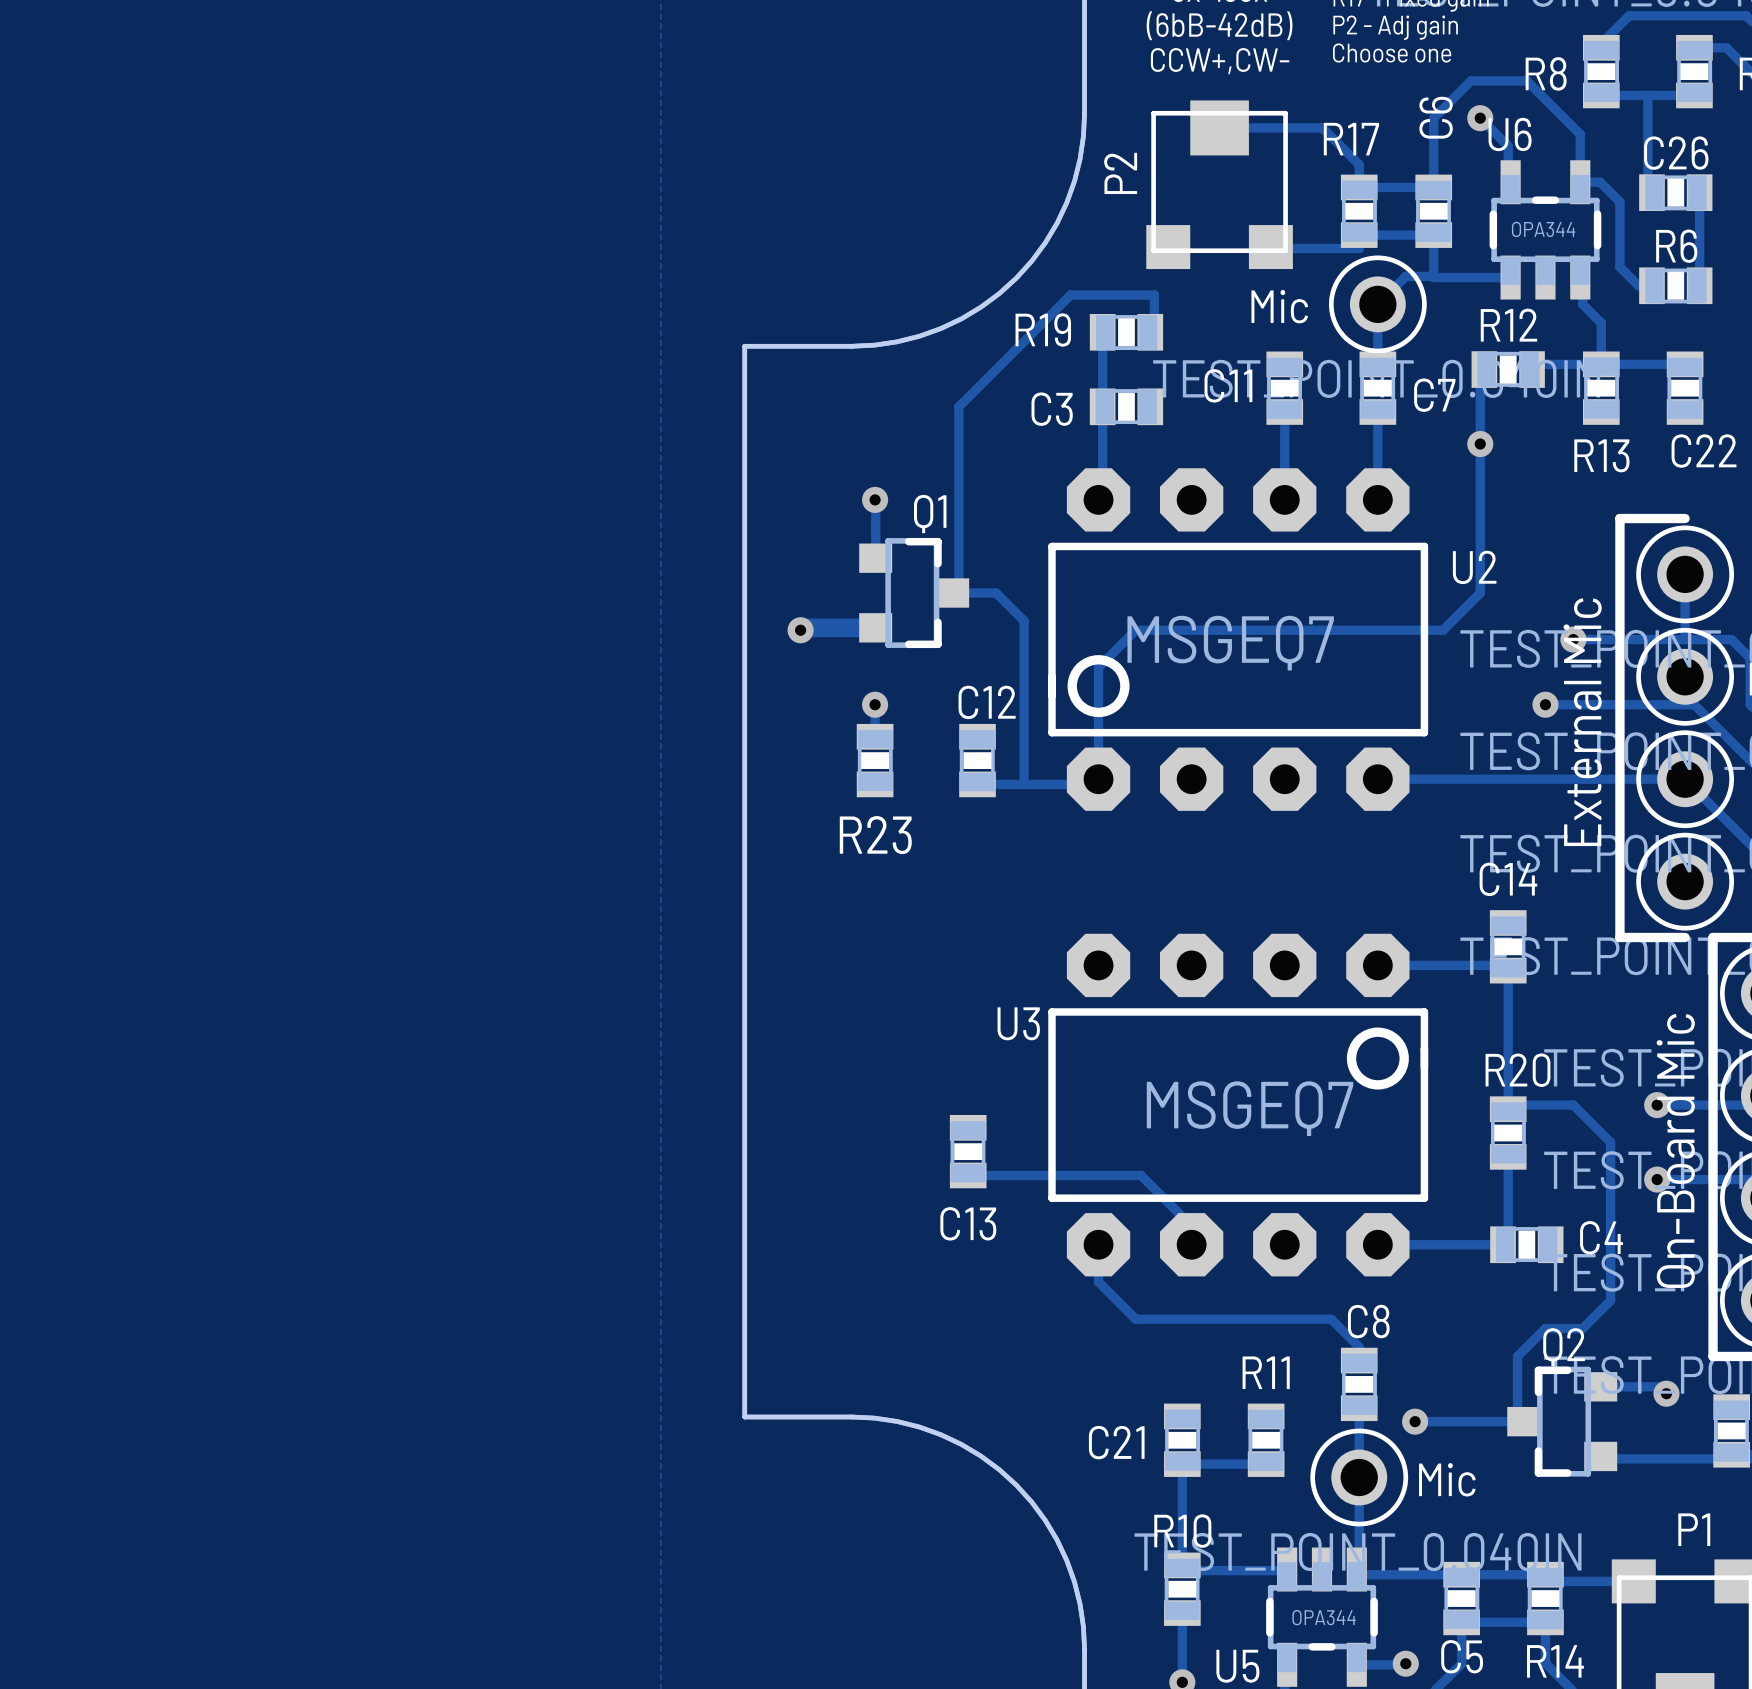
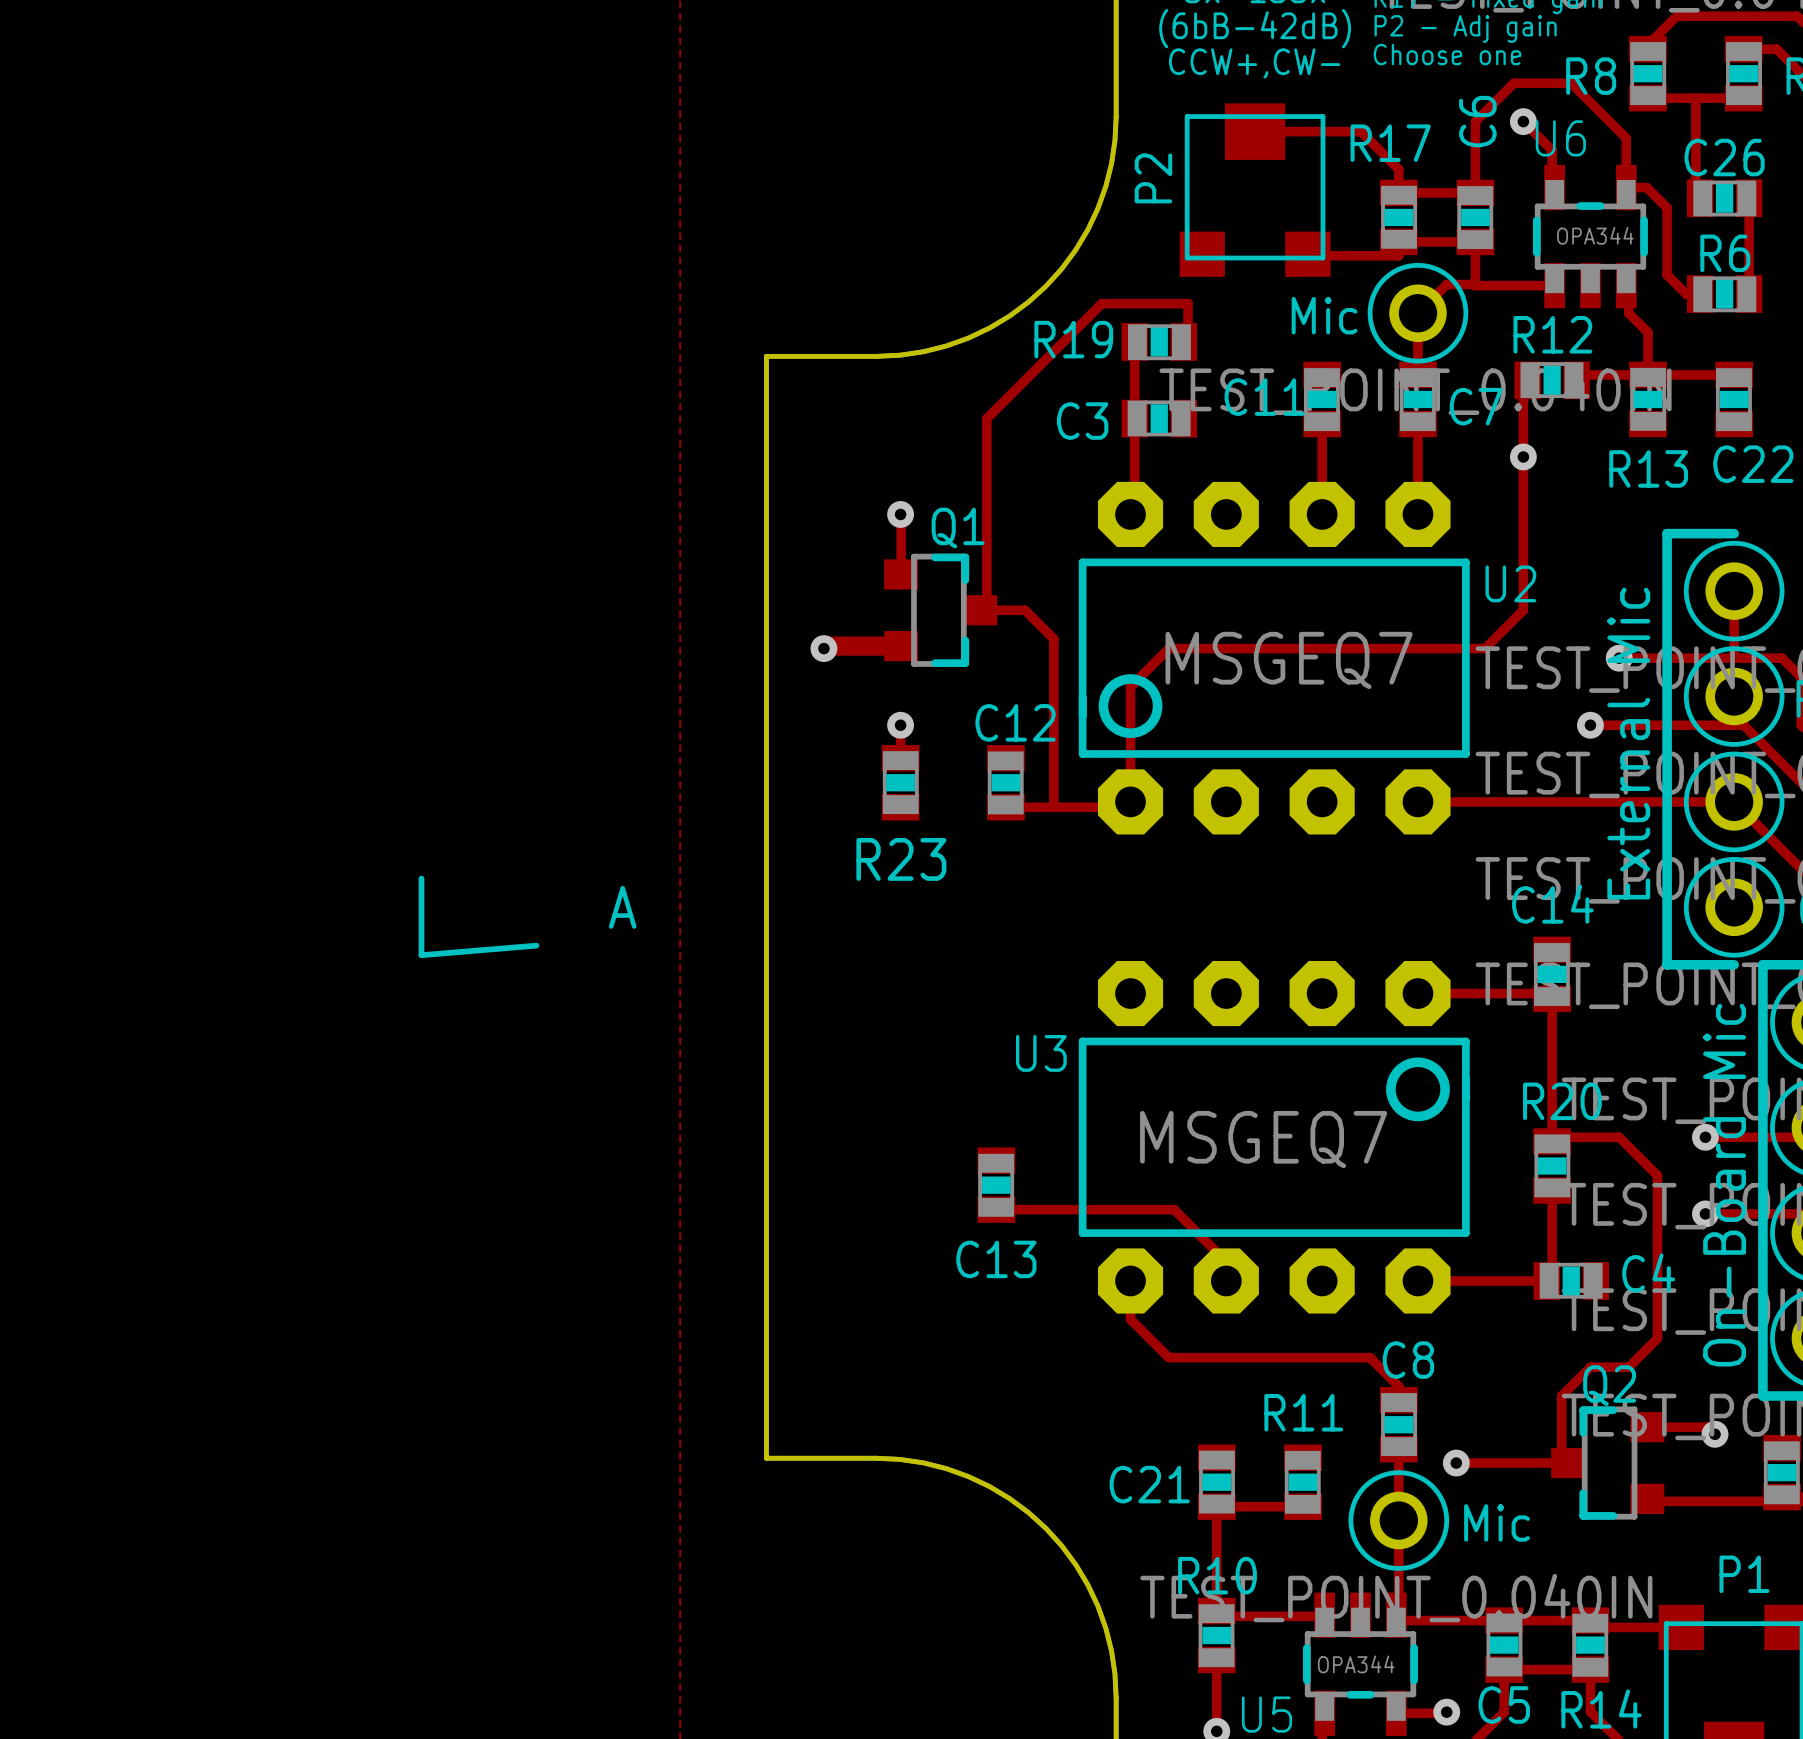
line: none -> (421, 878) (421, 955) (536, 945)
text: none -> A (622, 907)

